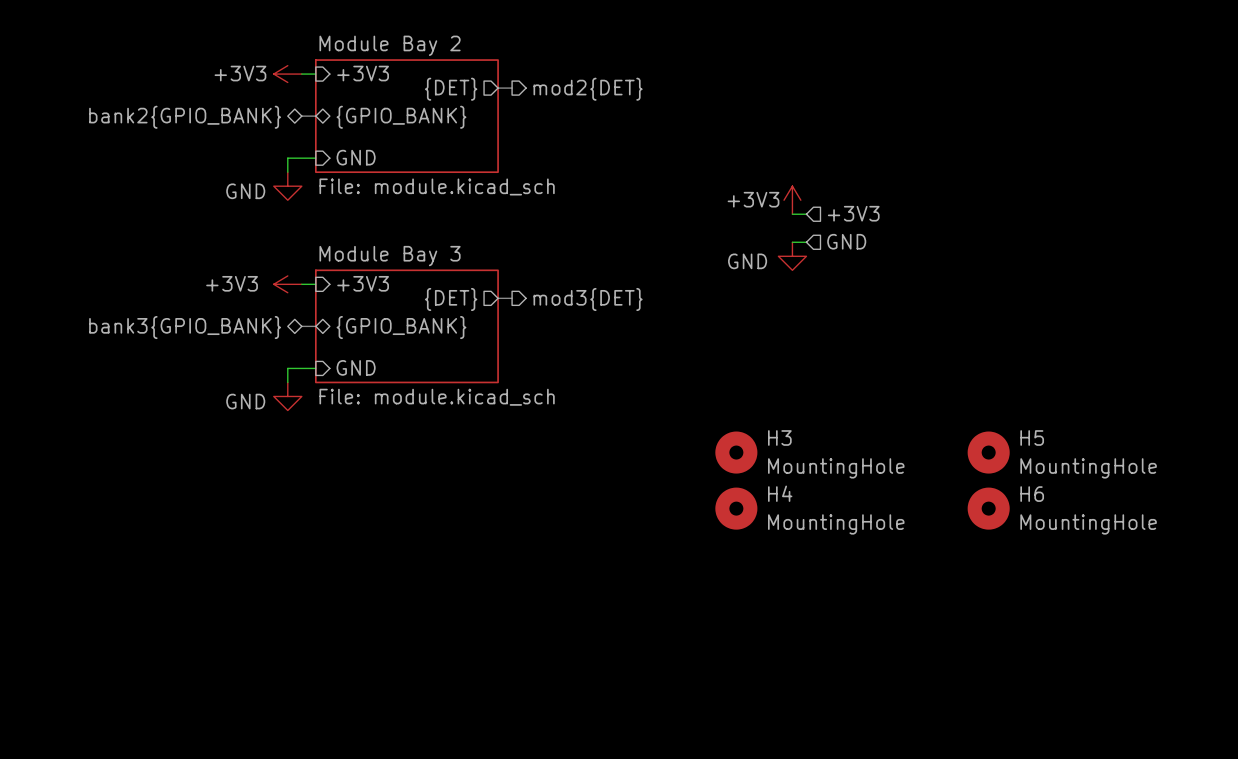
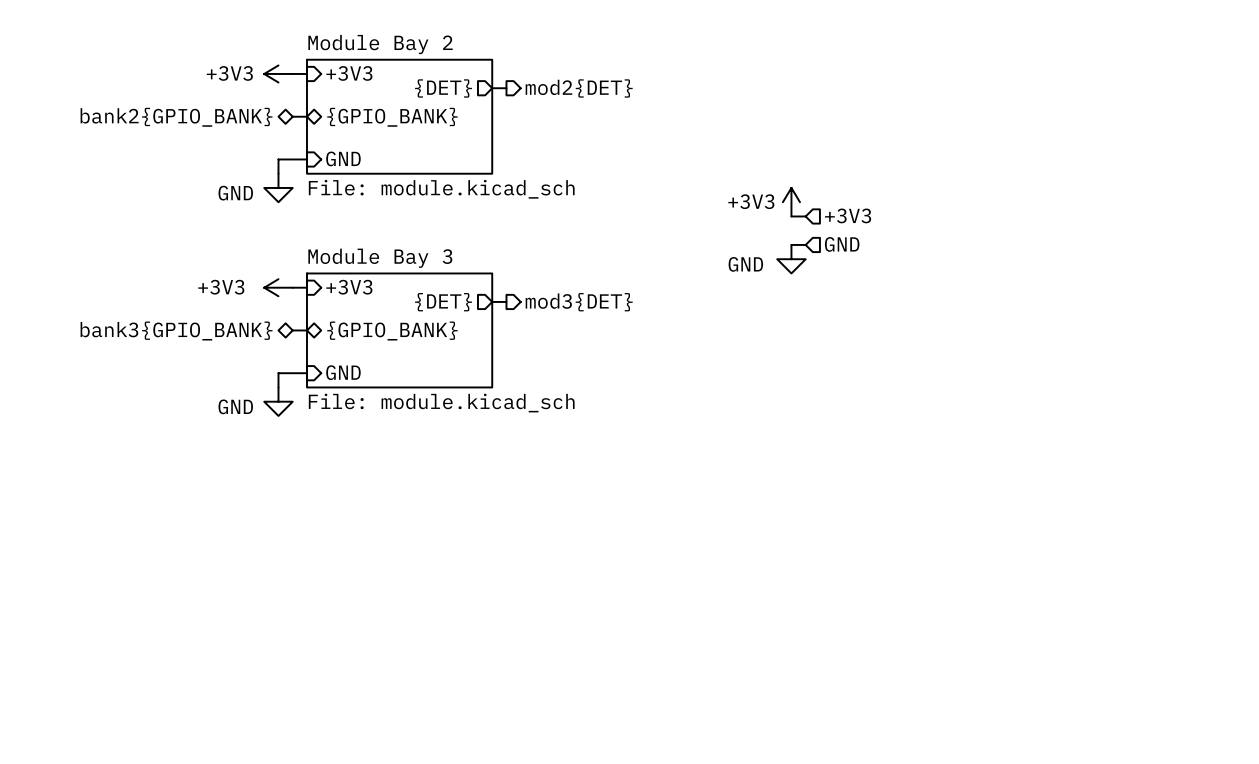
H3: MountingHole (736, 452) -> none
H5: MountingHole (988, 452) -> none
H4: MountingHole (736, 508) -> none
H6: MountingHole (988, 508) -> none

